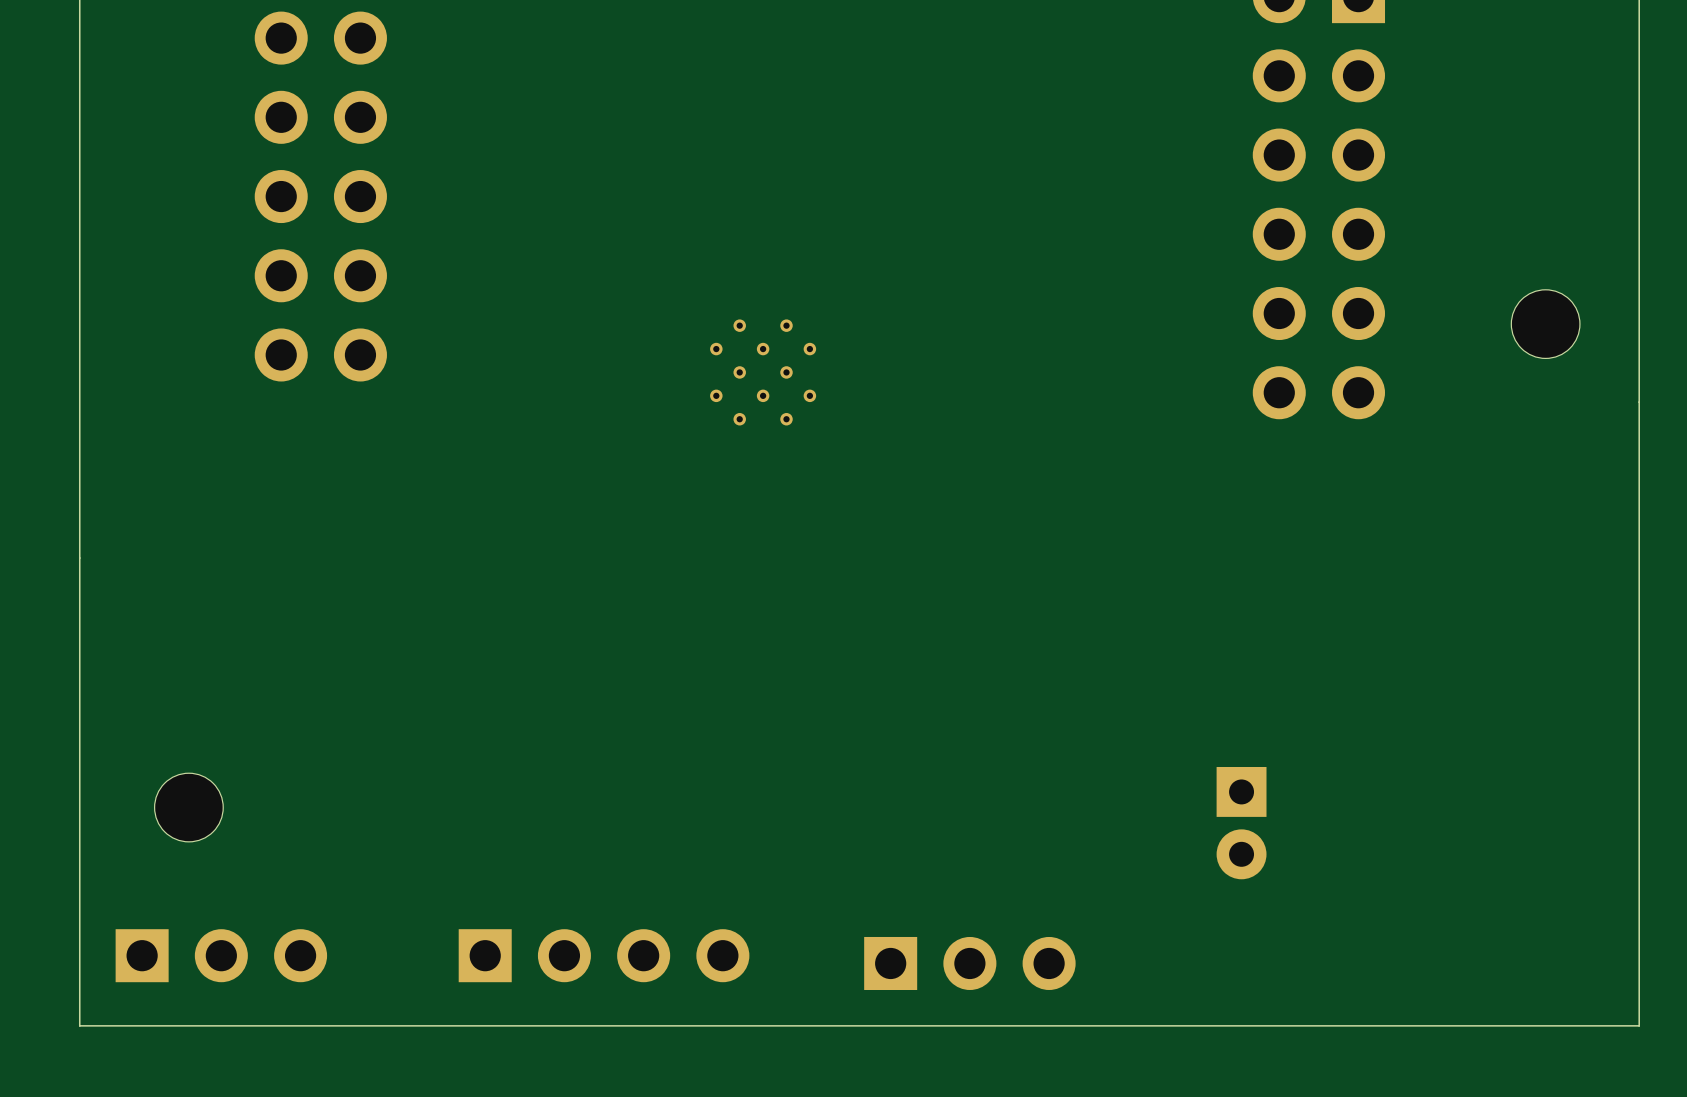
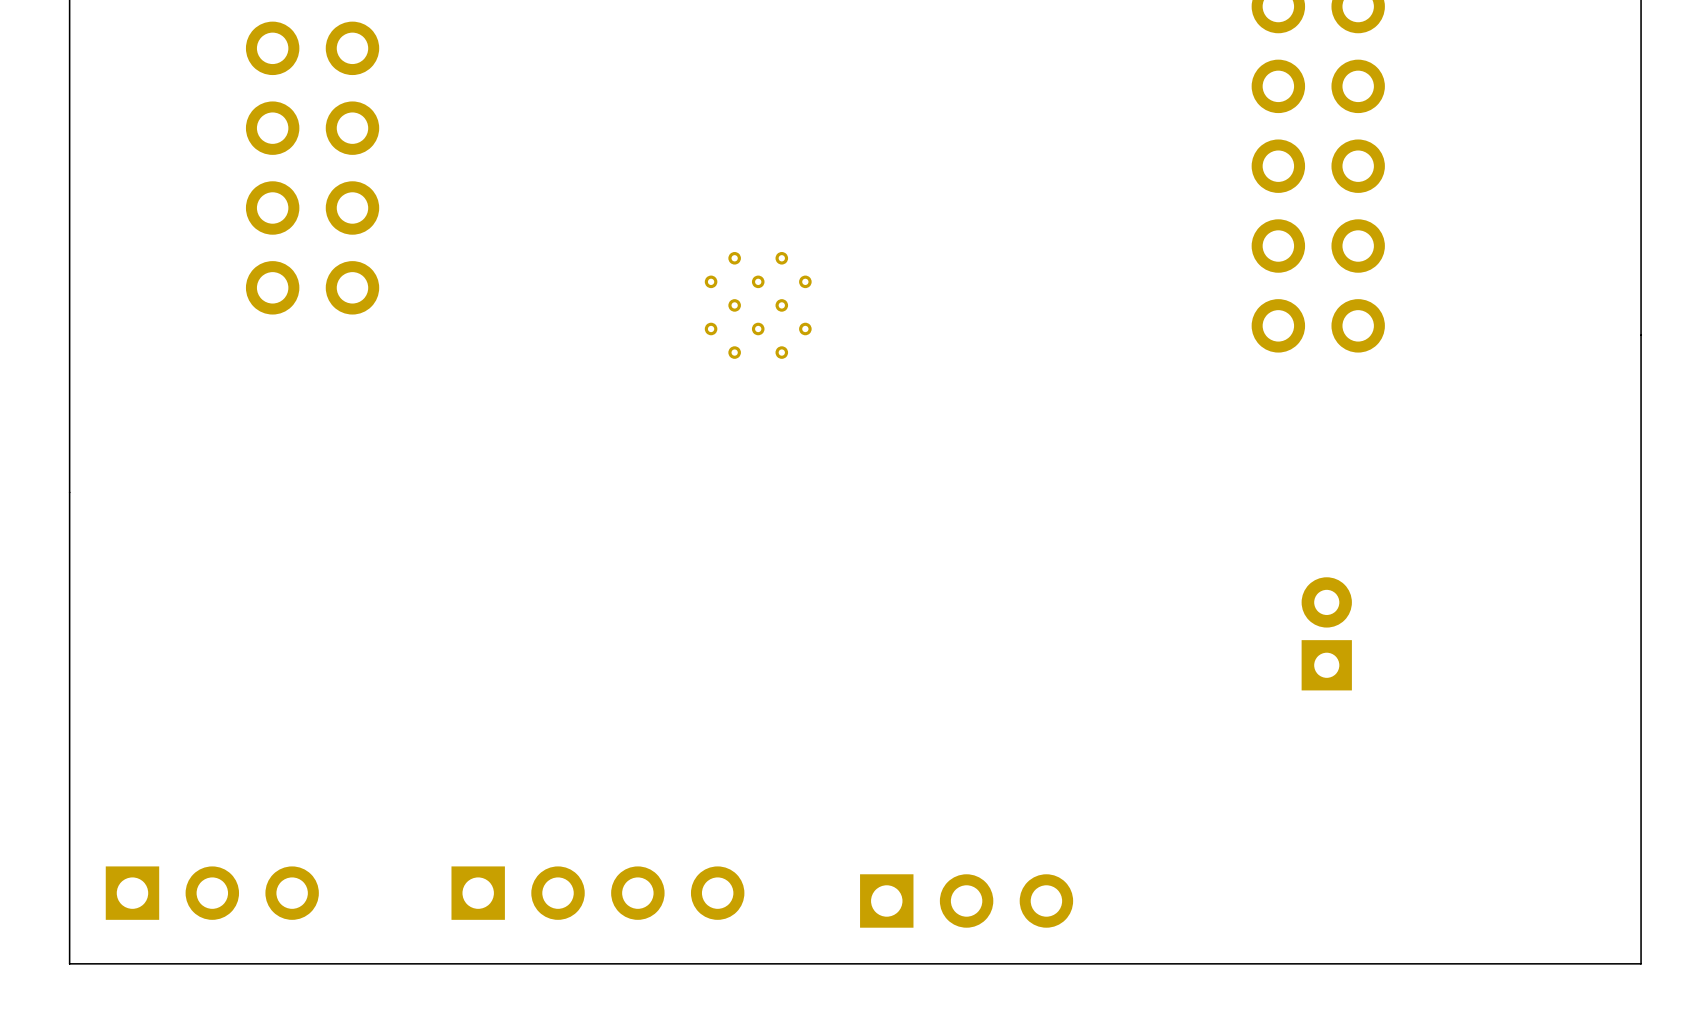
part: (1545, 324) -> none
part: (188, 807) -> none
part rotation: 0° (1241, 823) -> 180° (1326, 633)
part position: (1241, 823) -> (1326, 633)

